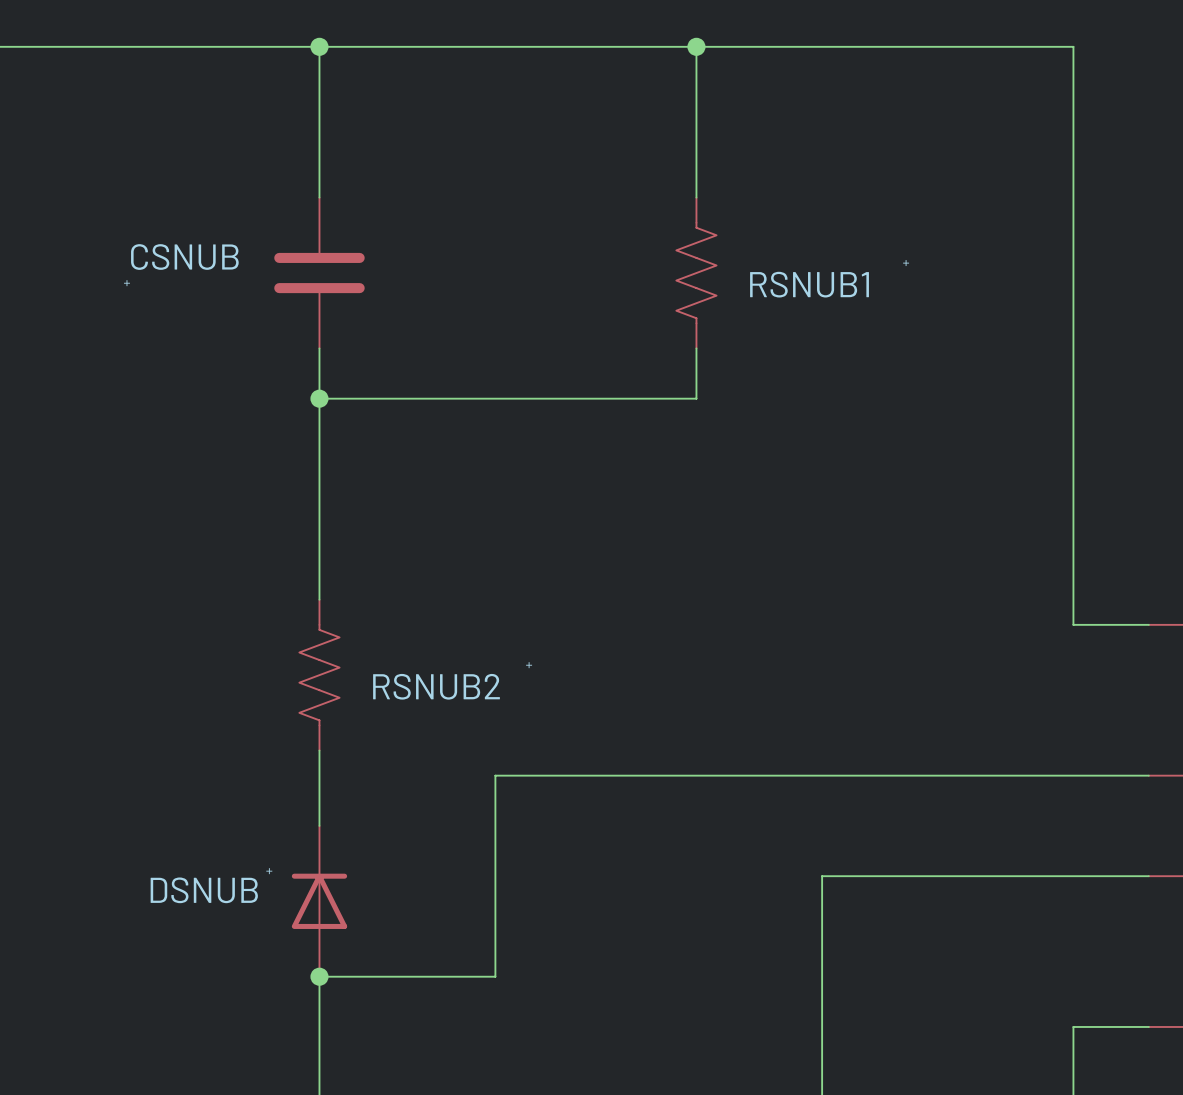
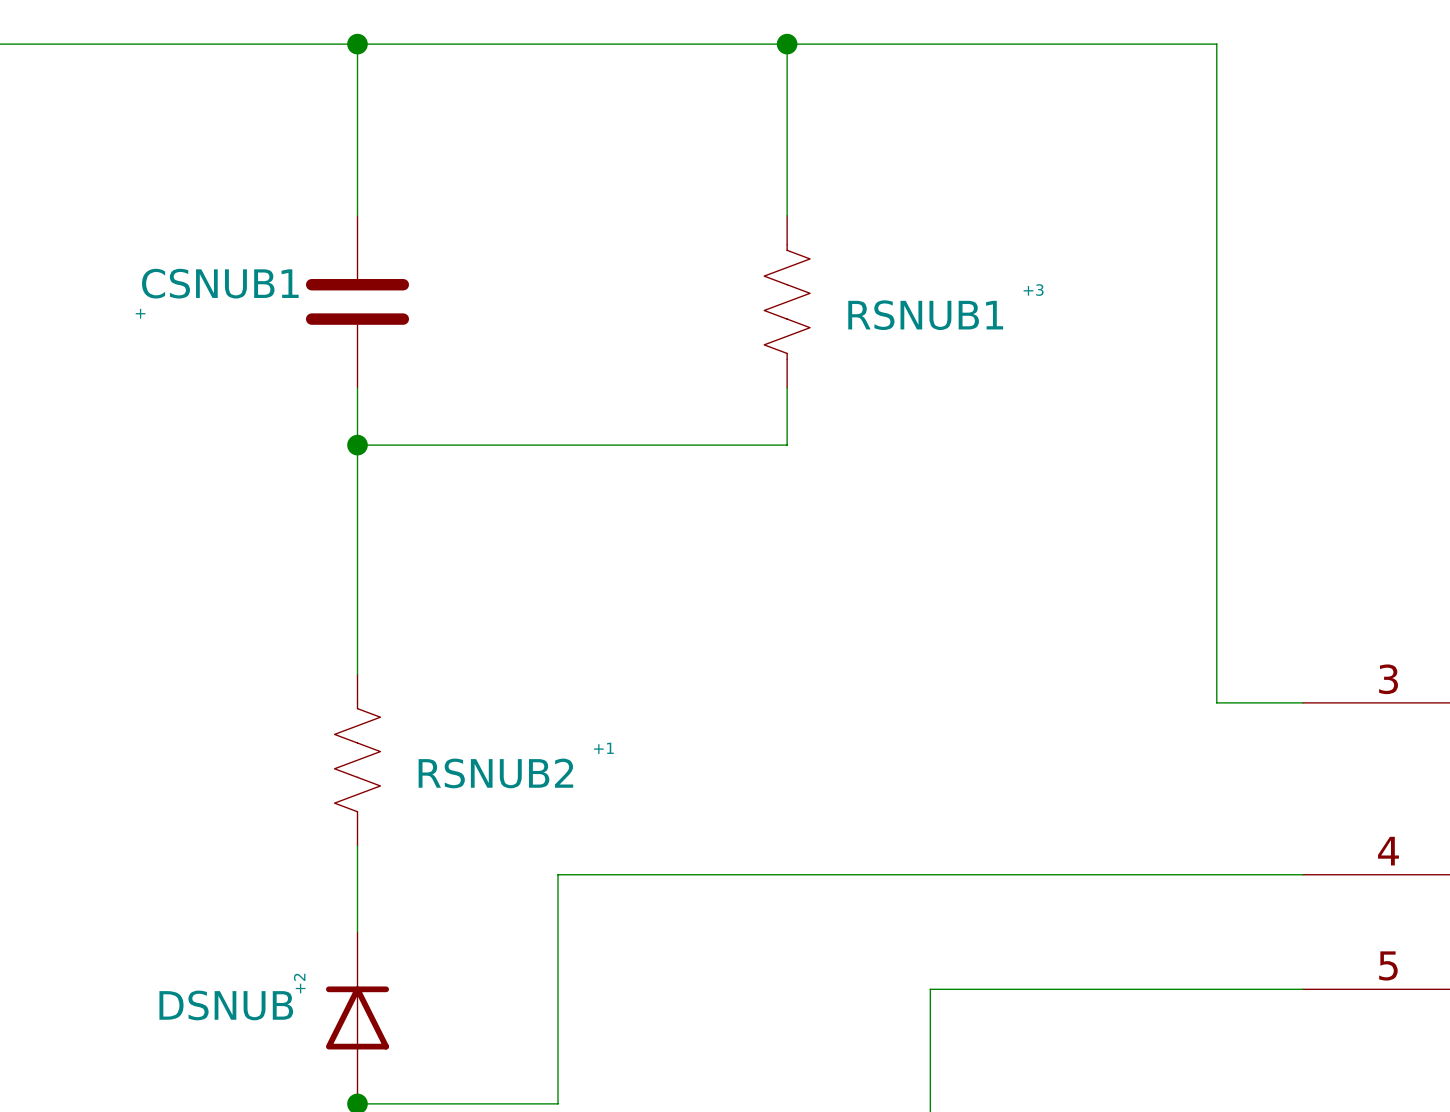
CSNUB name: CSNUB (184, 257) -> CSNUB1 (220, 283)
+3 name: + (906, 263) -> +3 (1033, 290)
+1 name: + (529, 665) -> +1 (603, 748)
+2 name: + (269, 871) -> +2 (299, 983)

